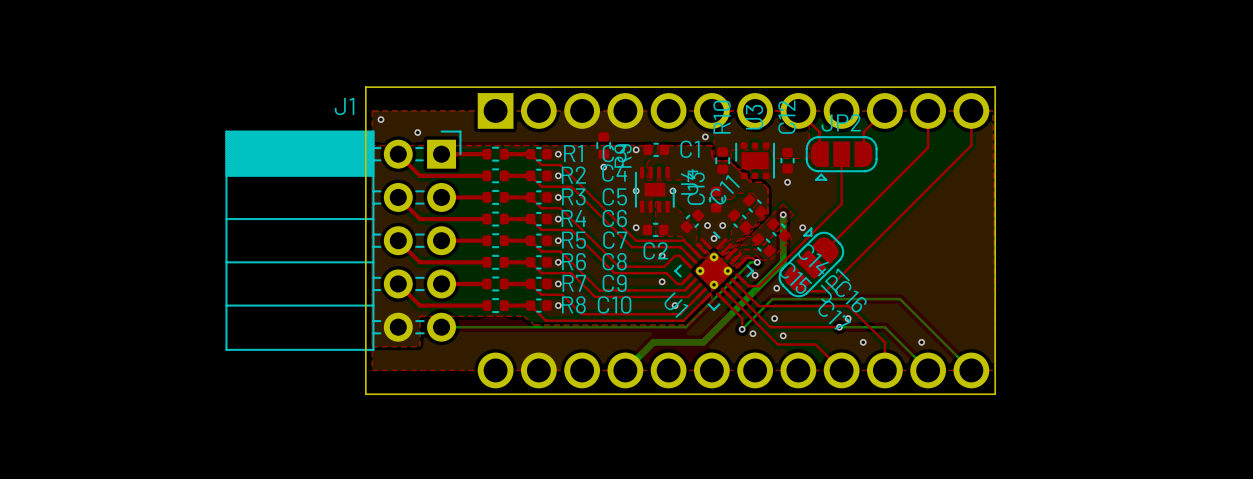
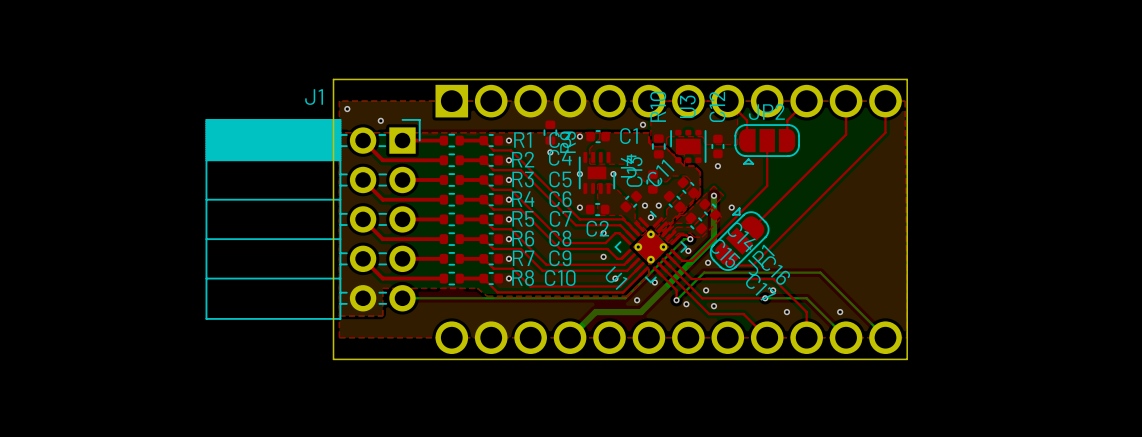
via: none -> (654, 282)
via: none -> (637, 300)

